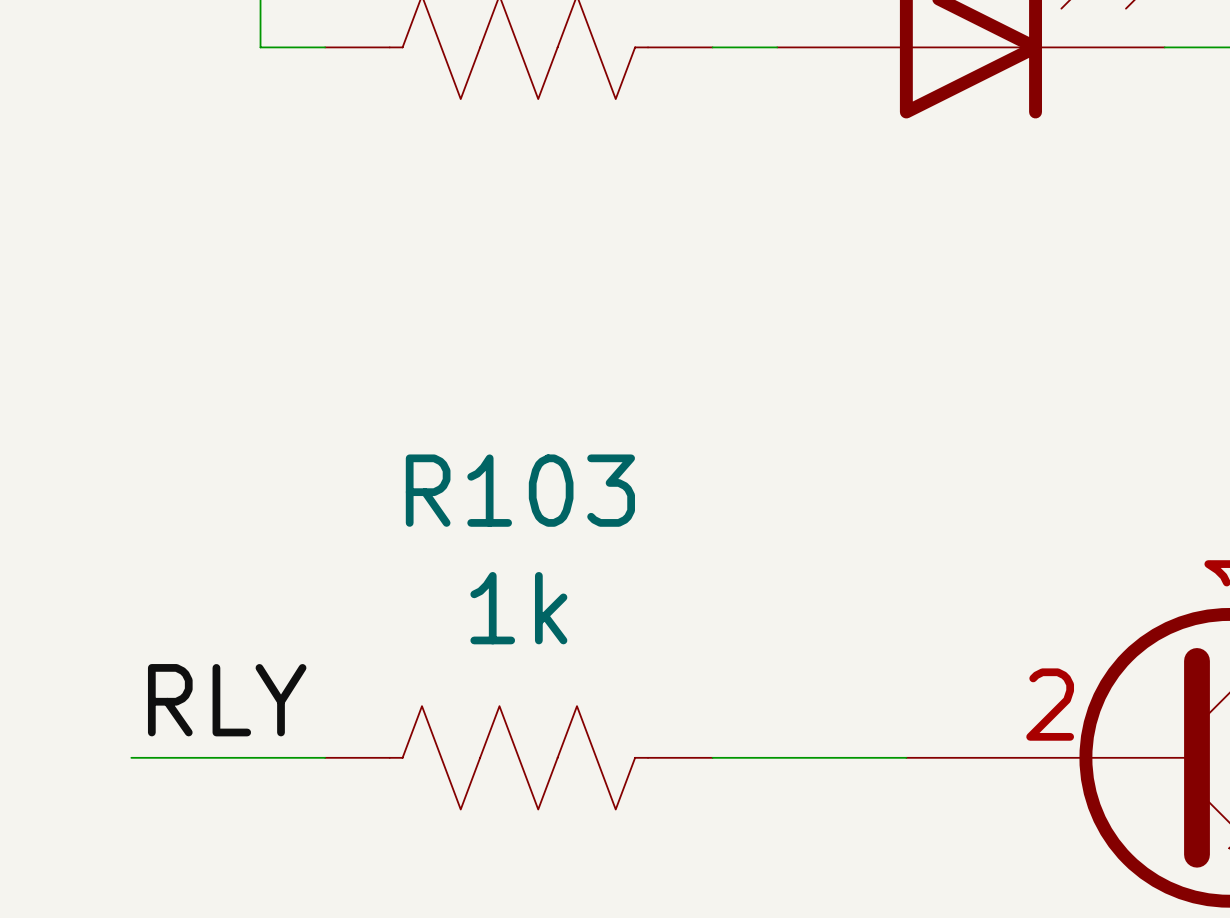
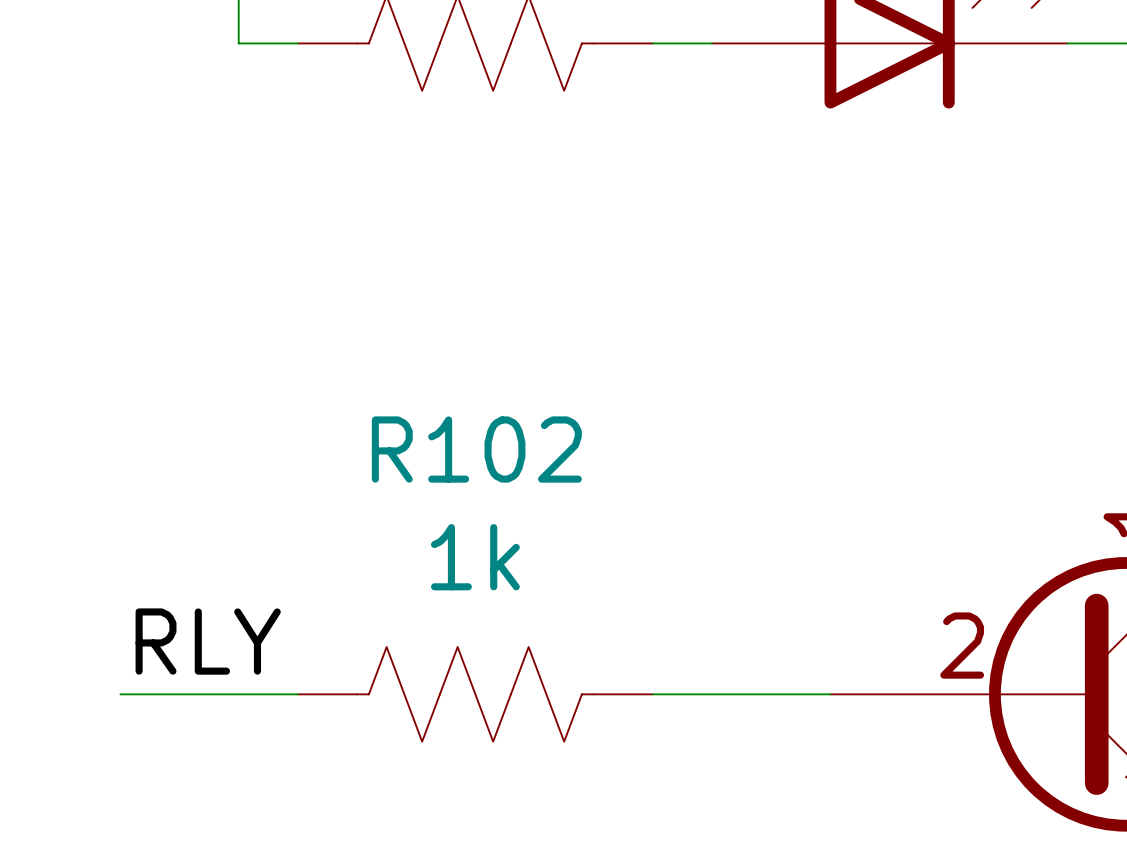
R103 name: R103 (520, 490) -> R102 (476, 449)

